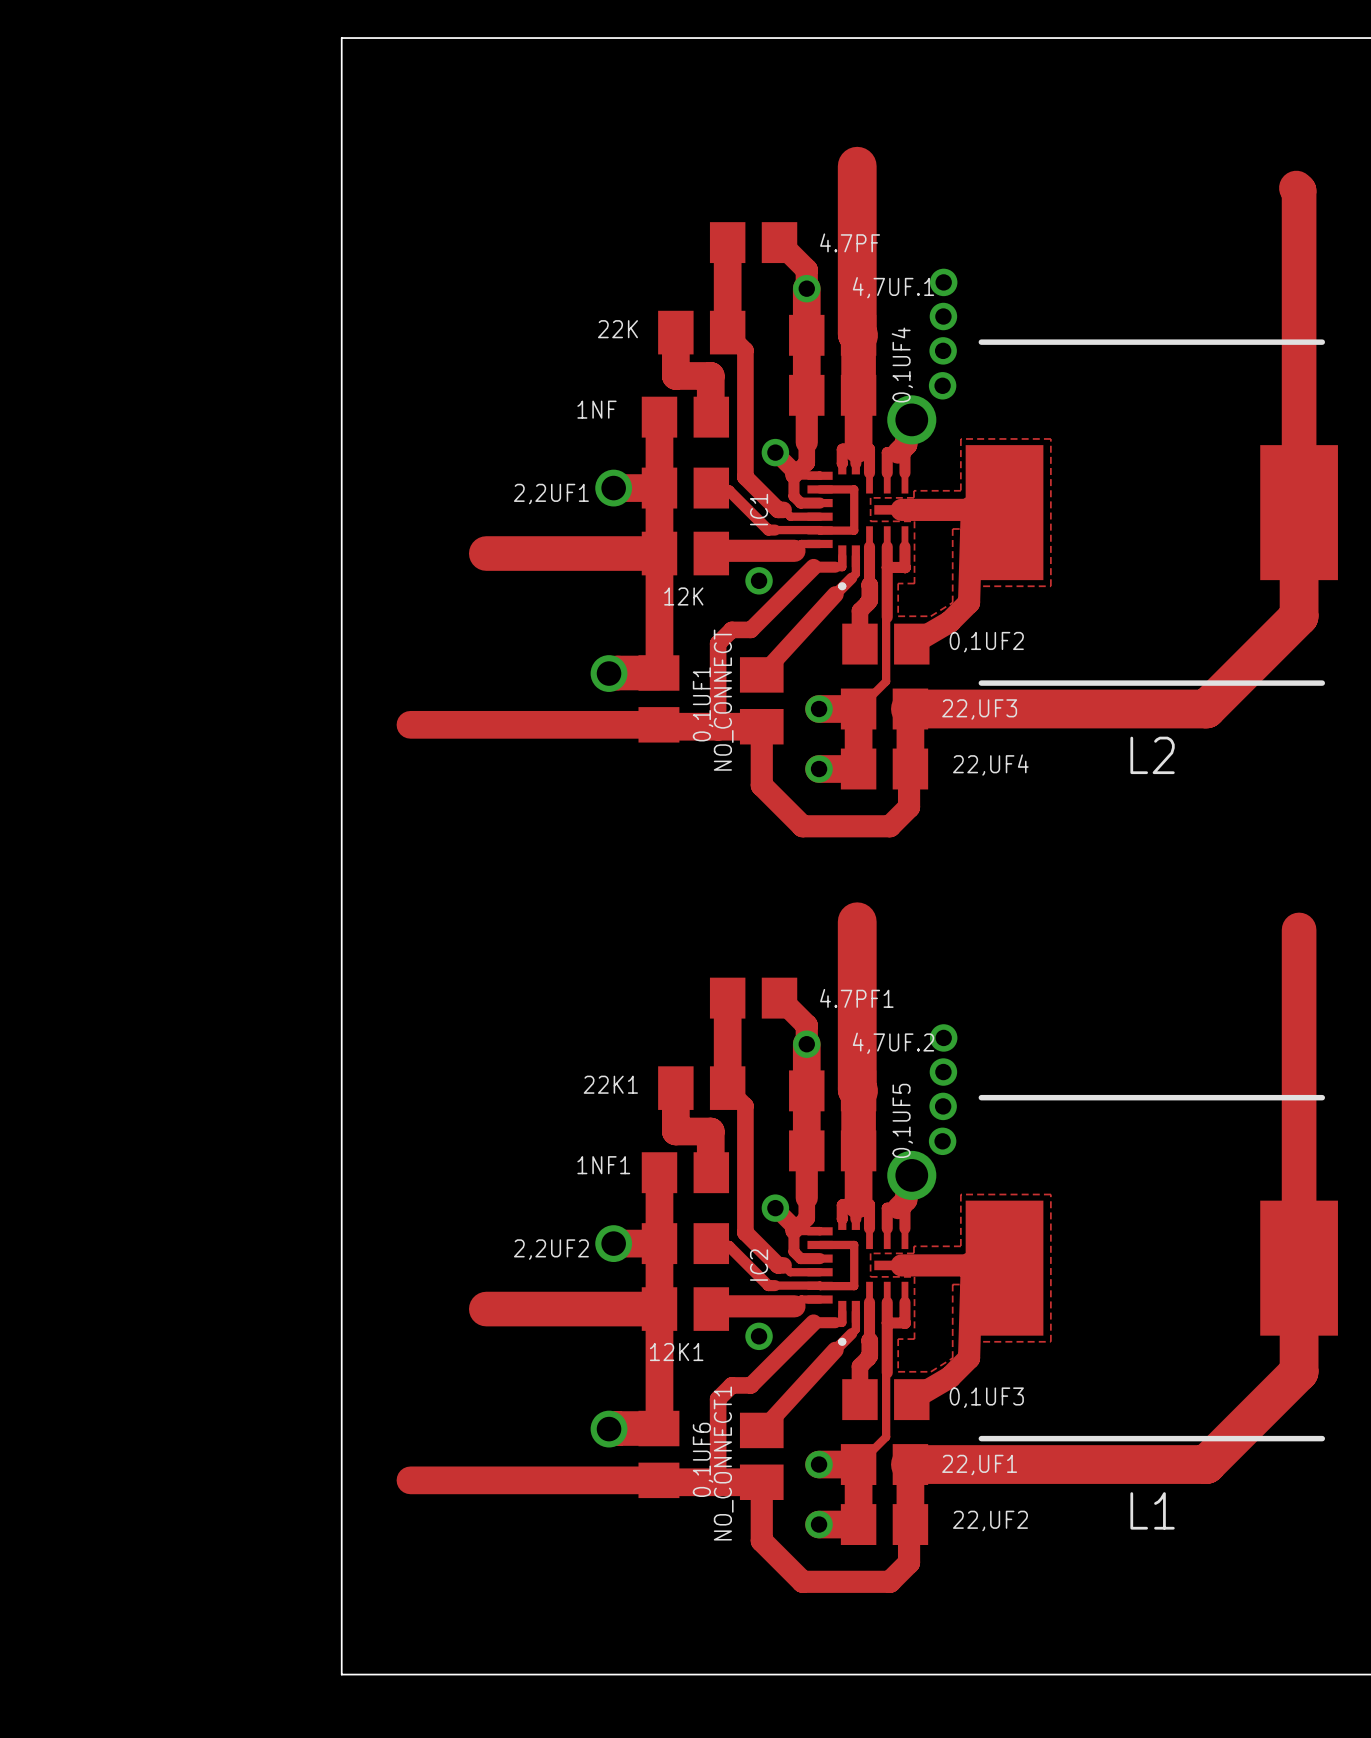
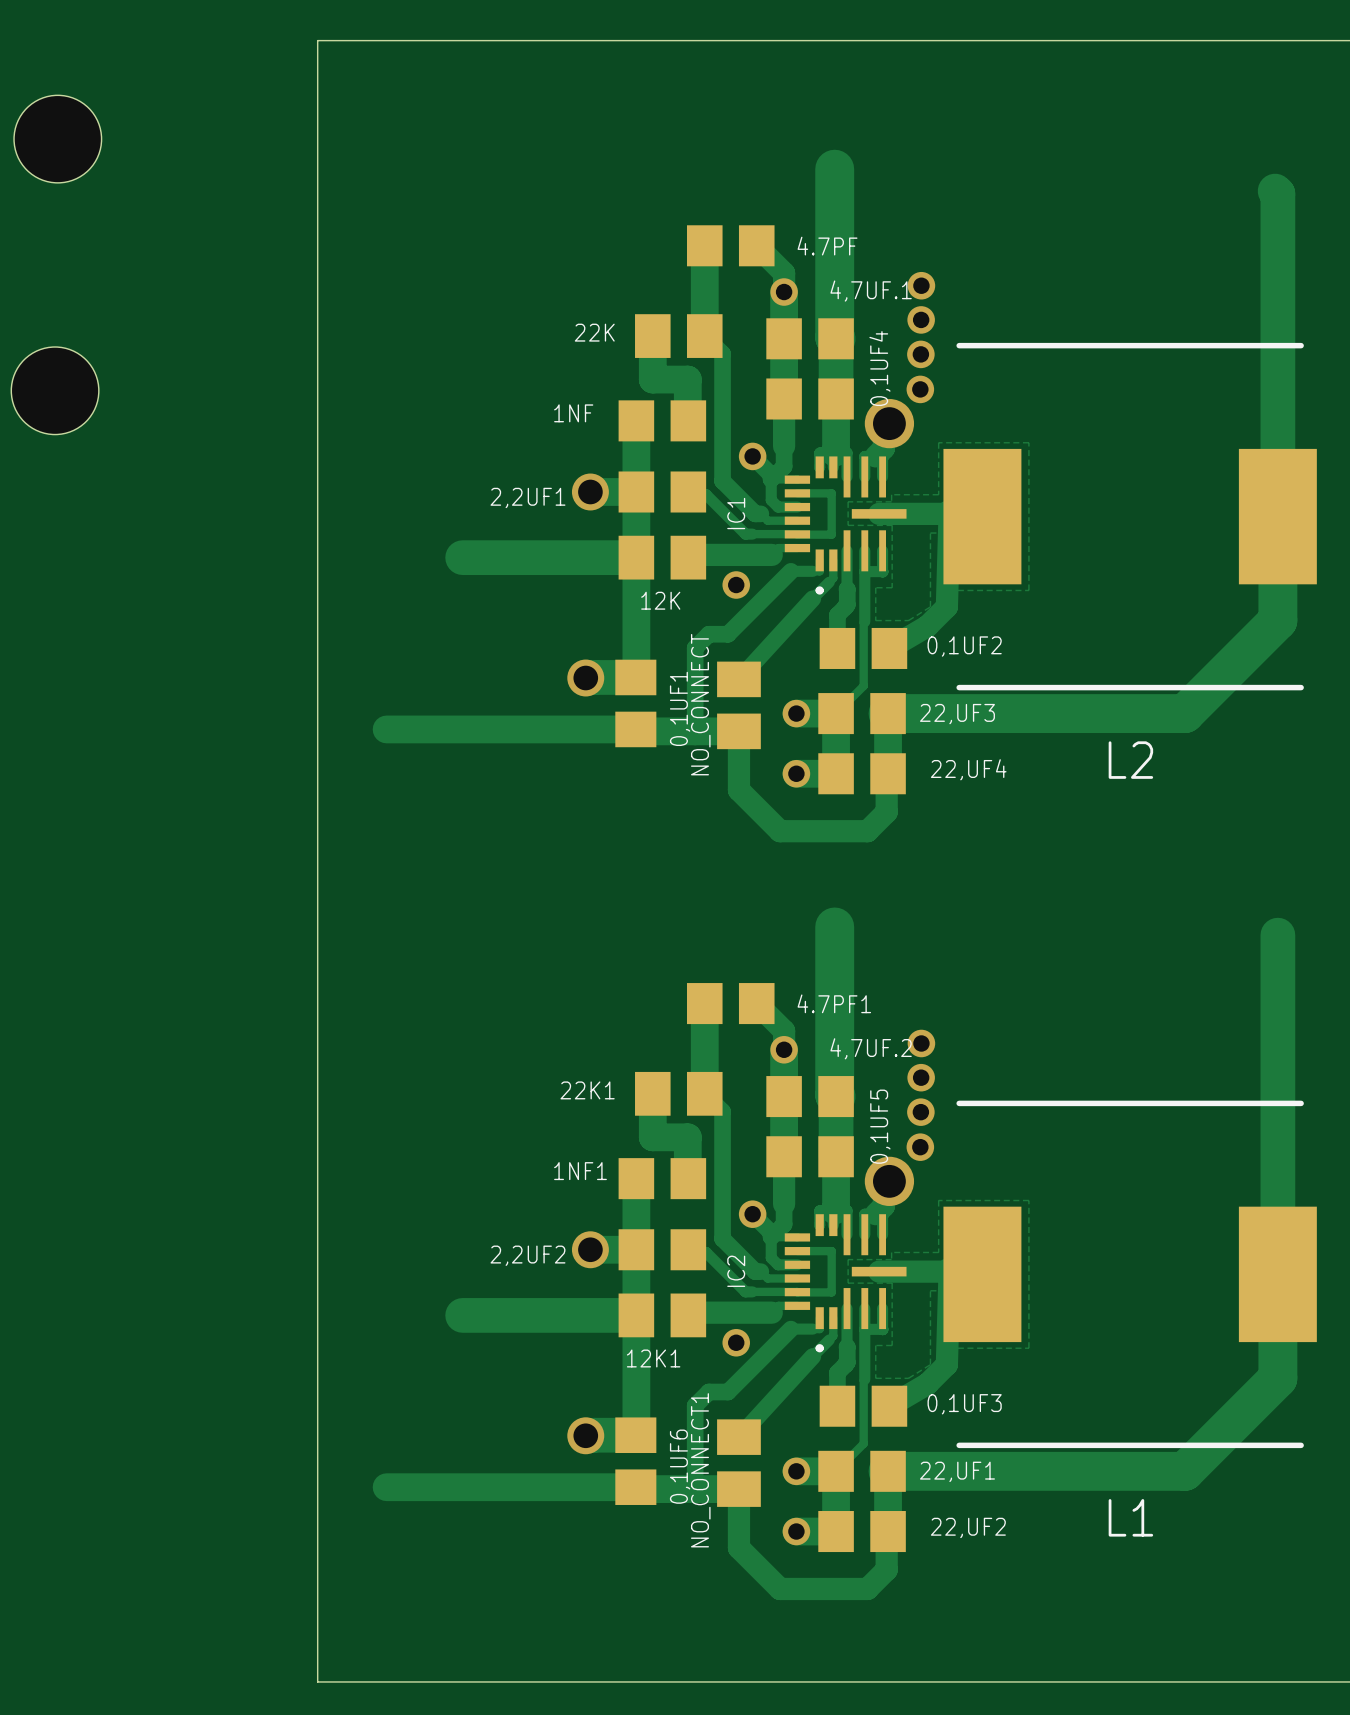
hole: none -> (57, 139)
hole: none -> (55, 390)

